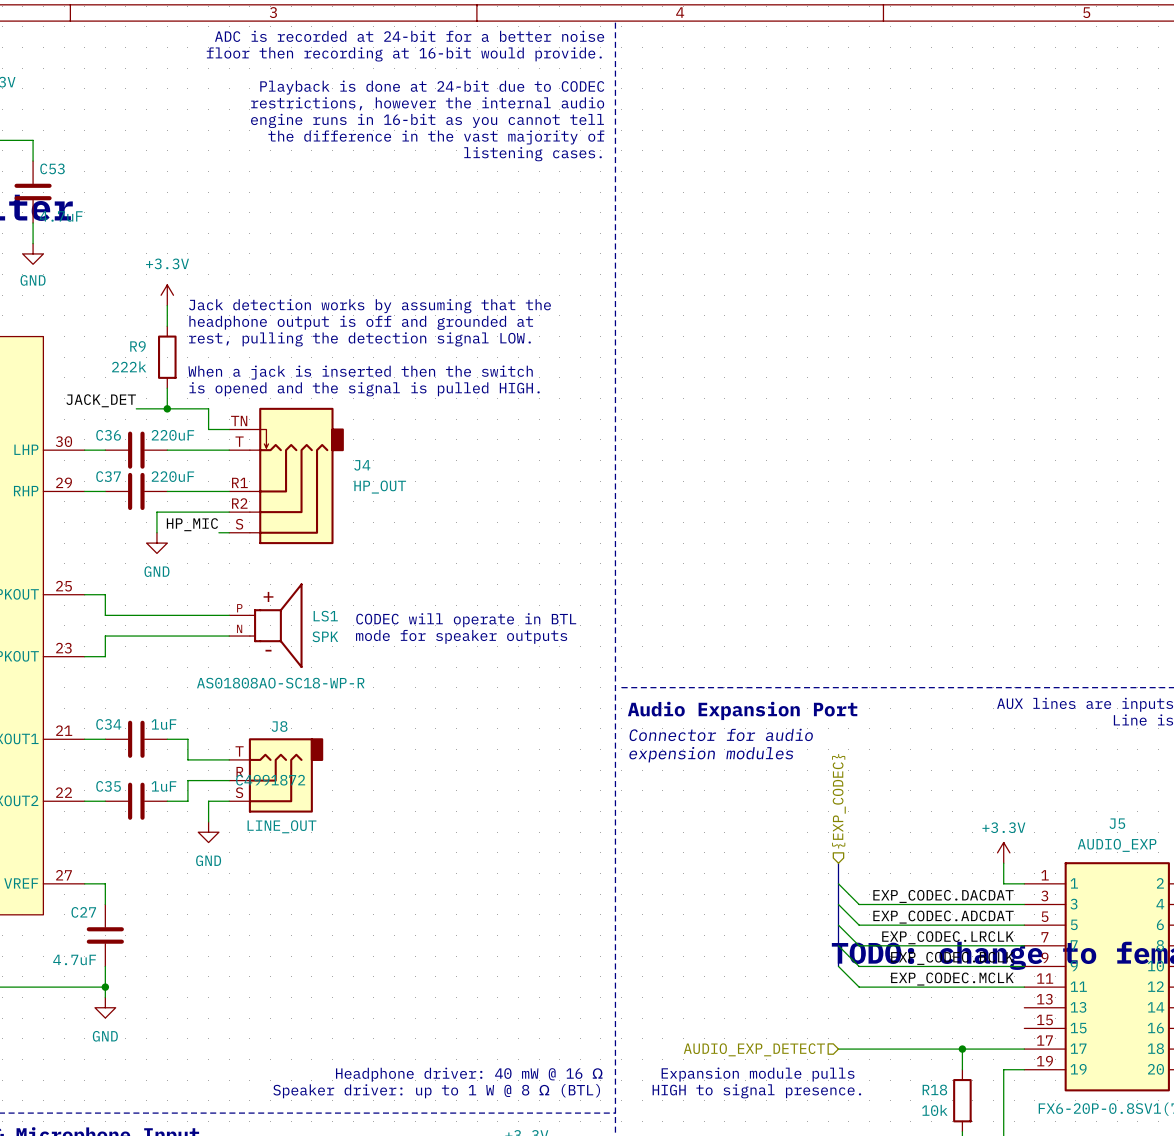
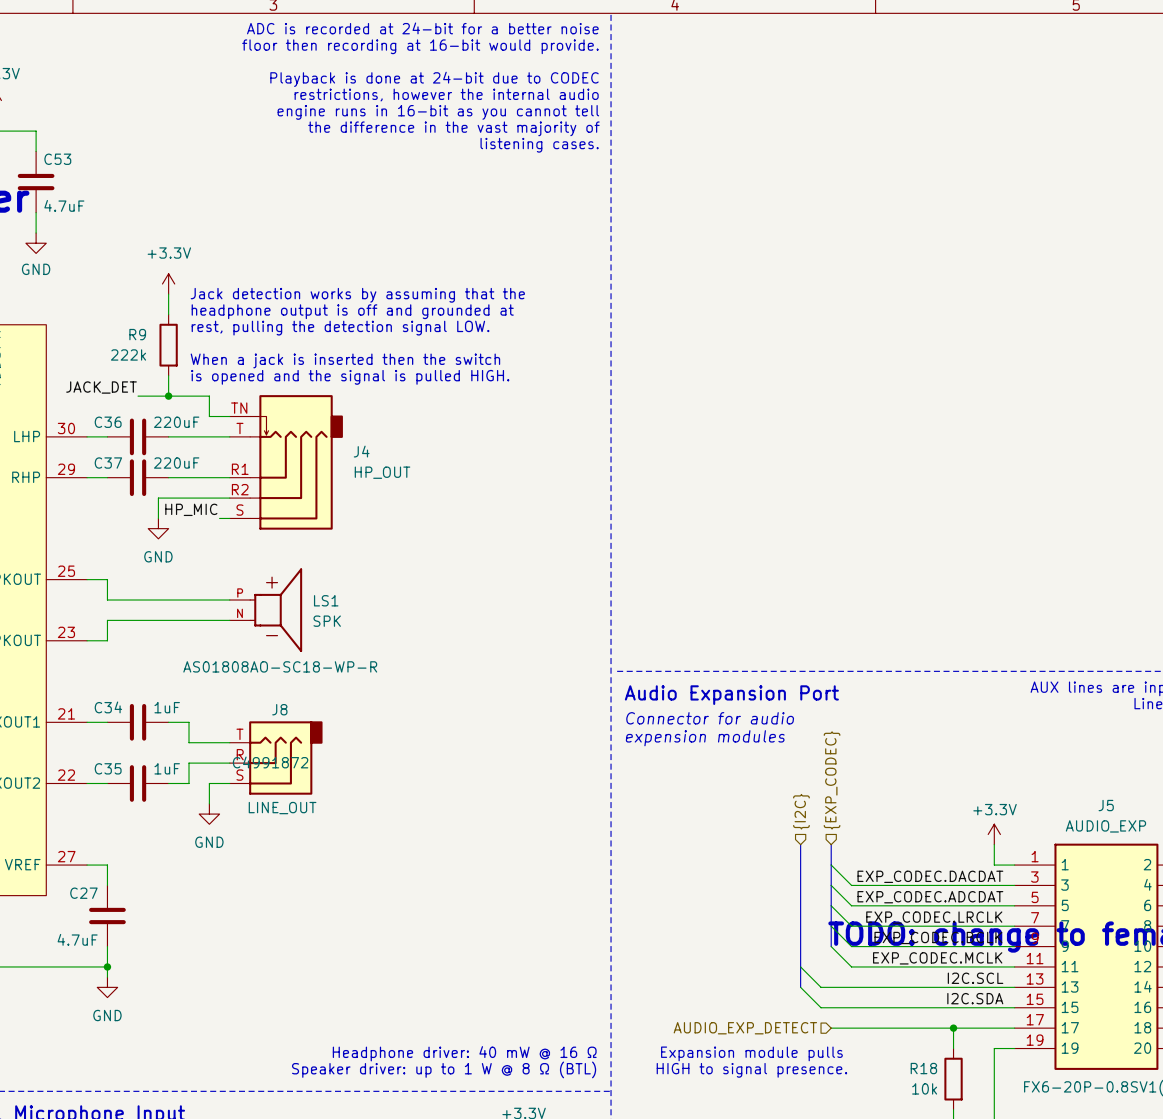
text: CODEC will operate in BTL (466, 620) -> none
text: mode for speaker outputs (461, 636) -> none
hierarchical label: none -> {I2C} (801, 811)
bus: none -> (800, 844) (800, 987)
wire: none -> (800, 966) (821, 987) (1014, 987)
label: none -> I2C.SCL (975, 978)
wire: none -> (800, 987) (821, 1007) (1014, 1007)
label: none -> I2C.SDA (975, 998)

